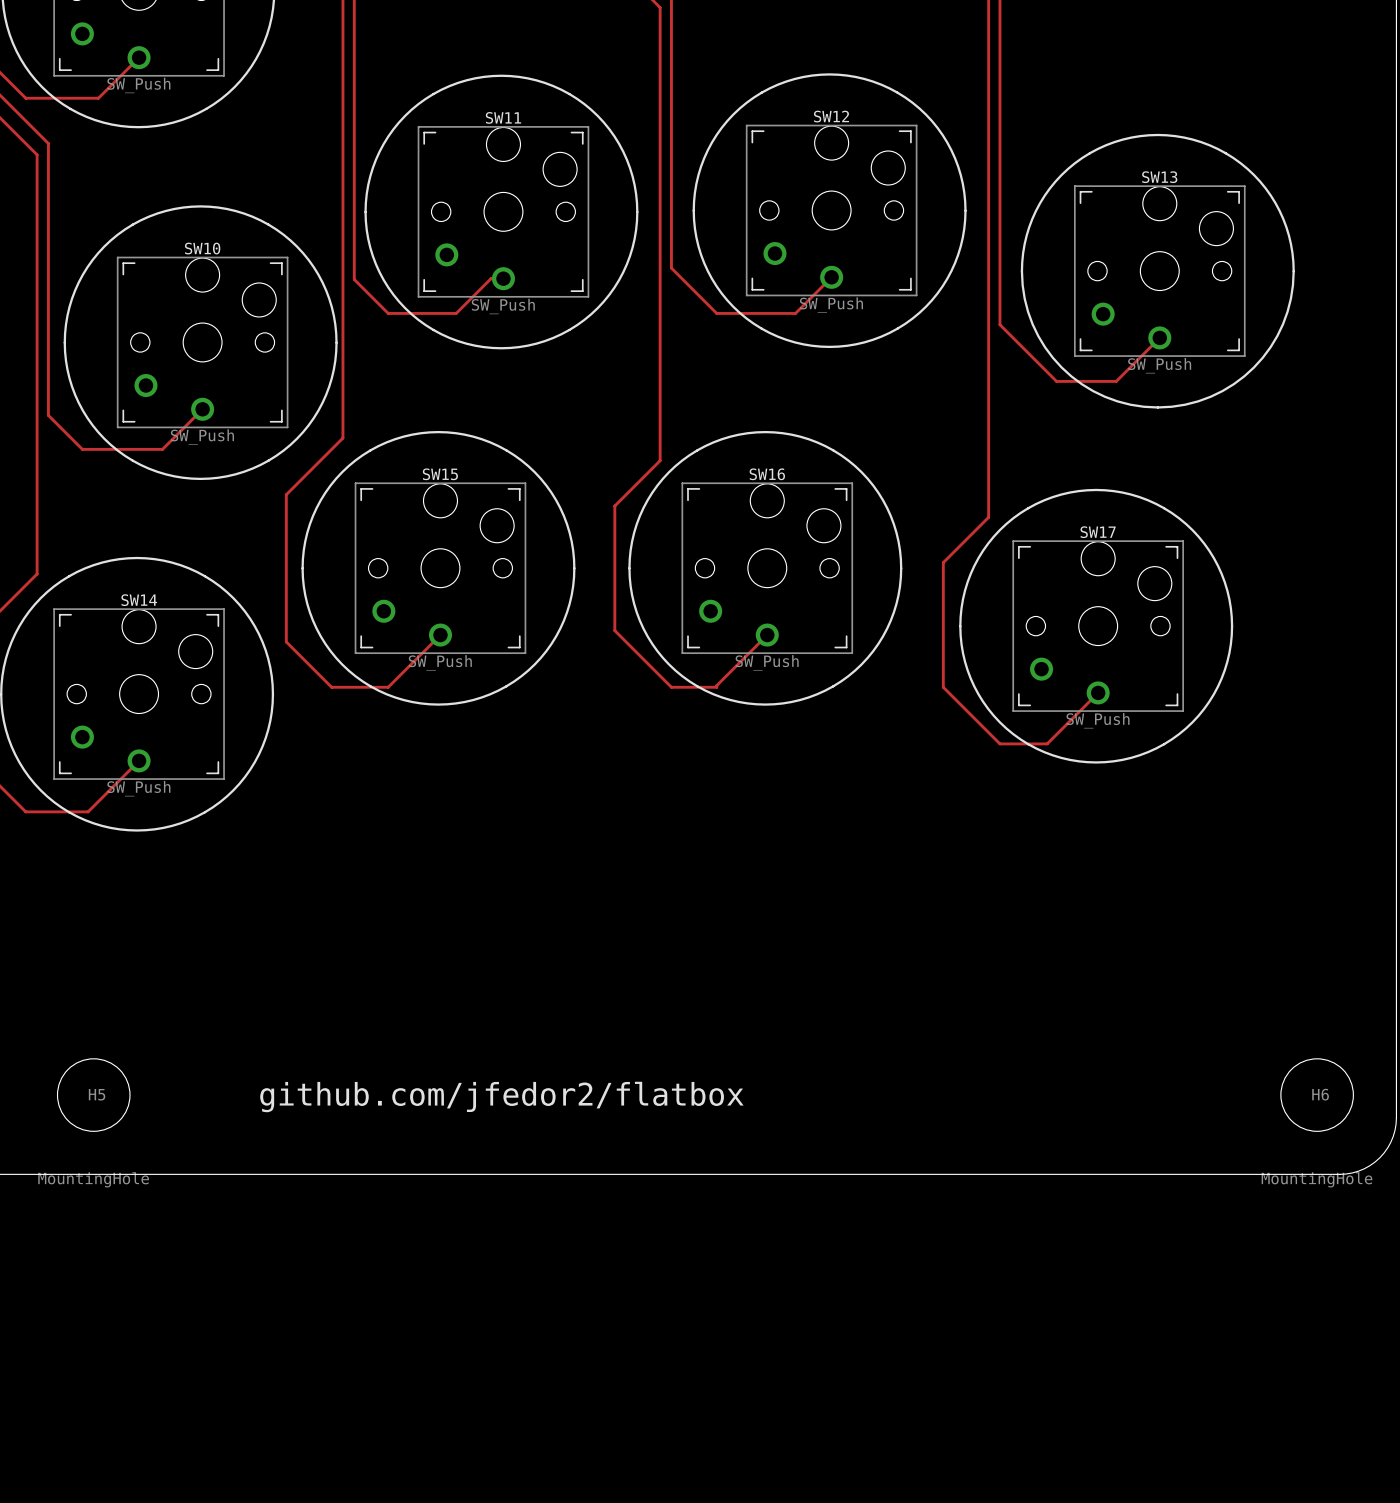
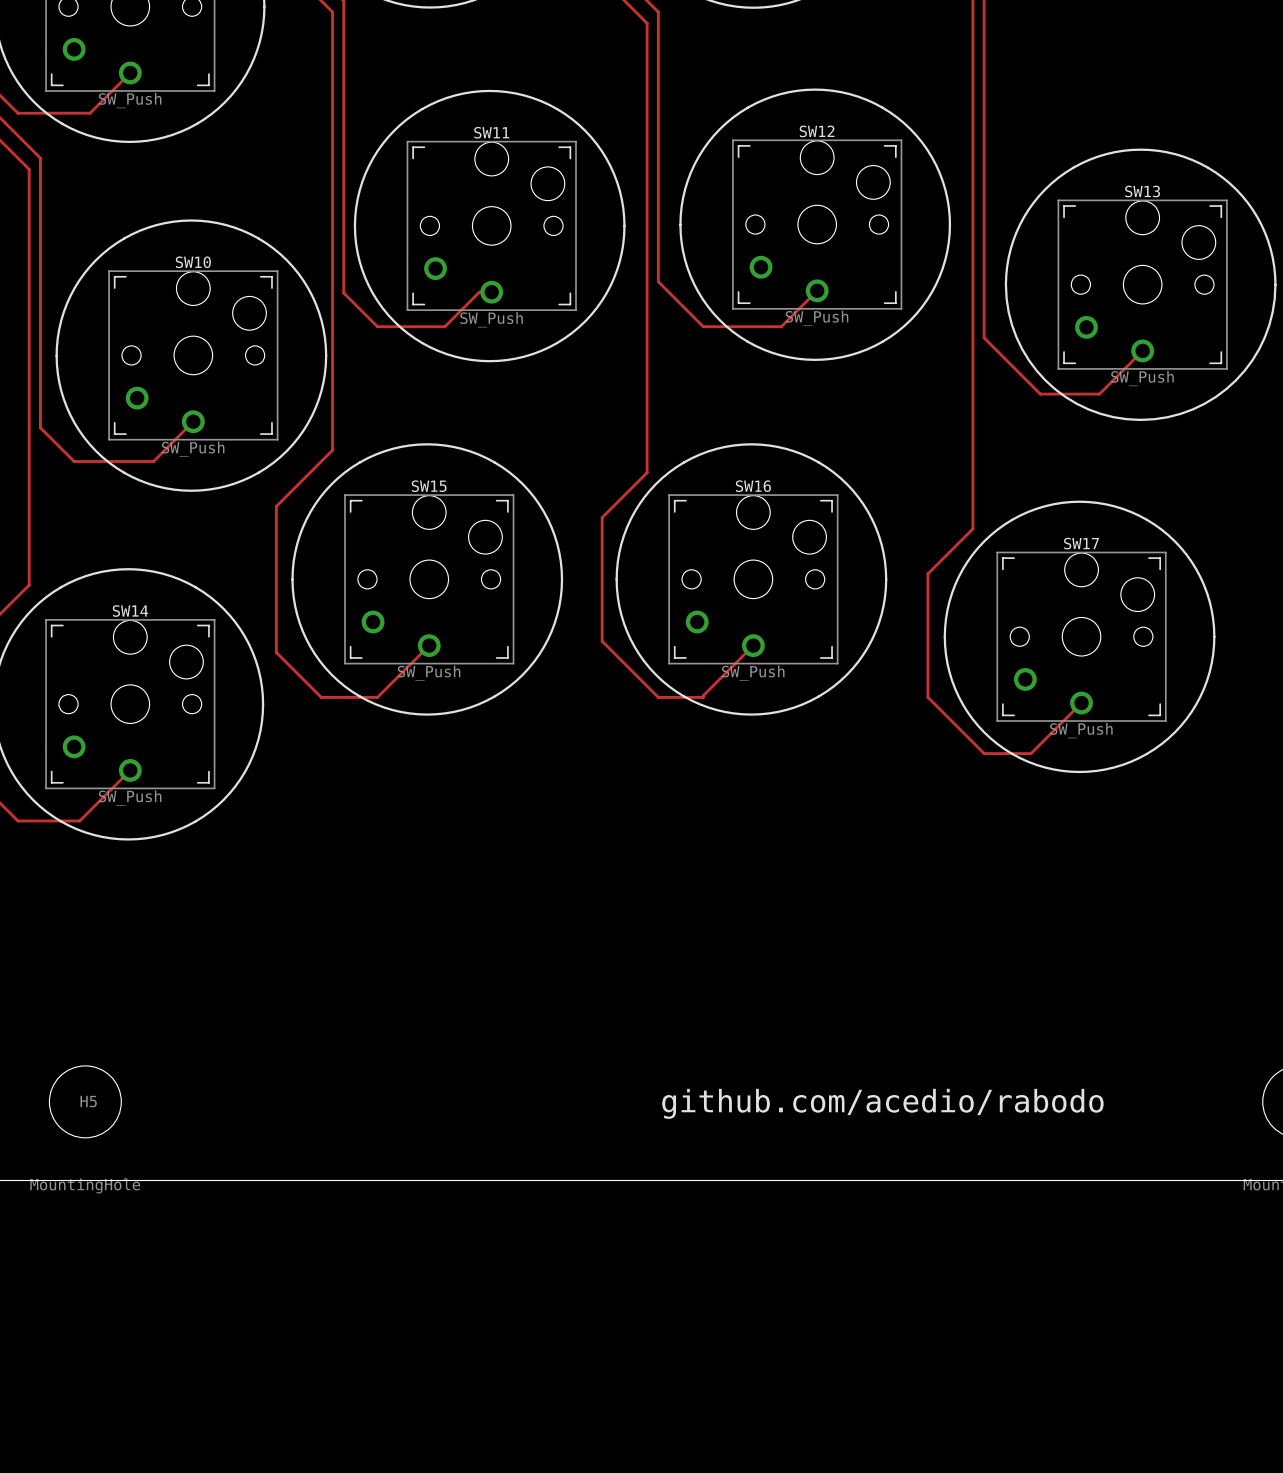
text: github.com/jfedor2/flatbox (501, 1097) -> none
text: none -> github.com/acedio/rabodo (882, 1103)

